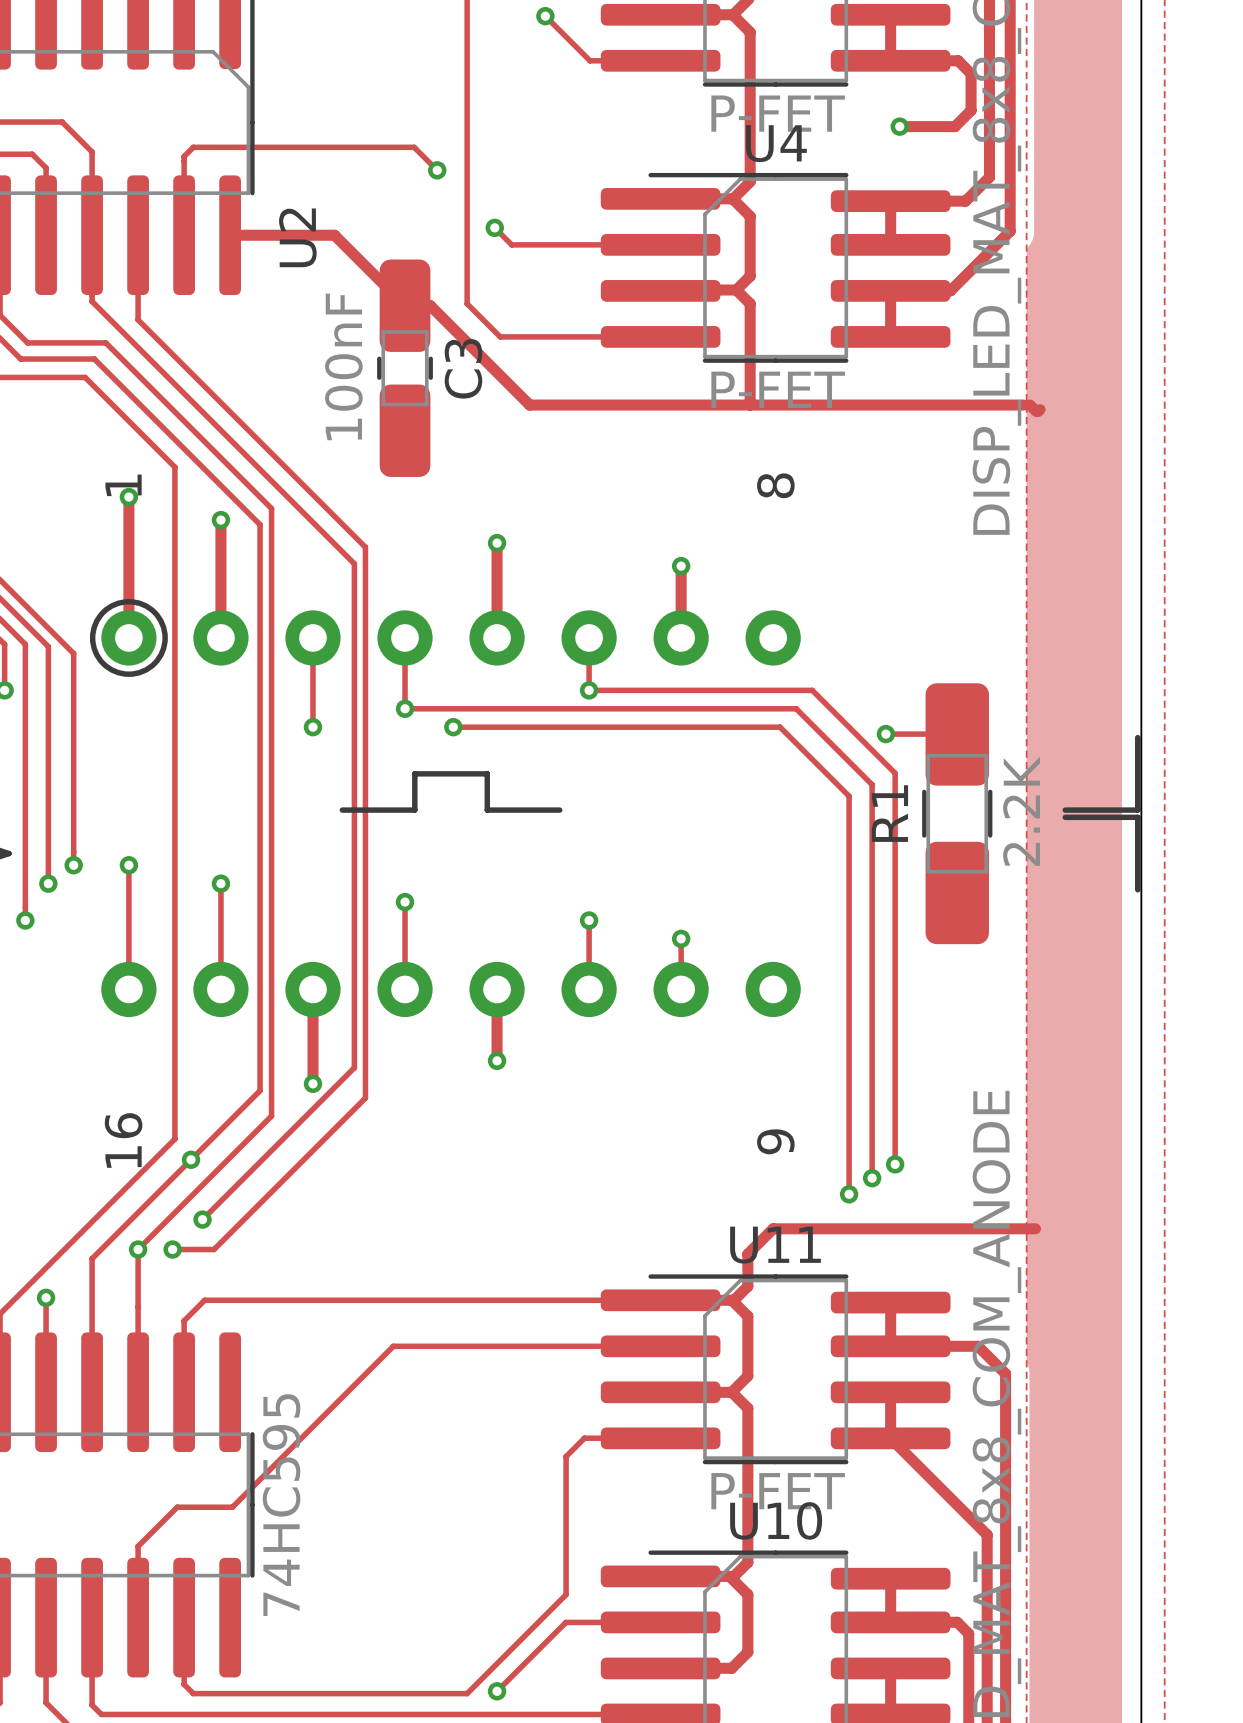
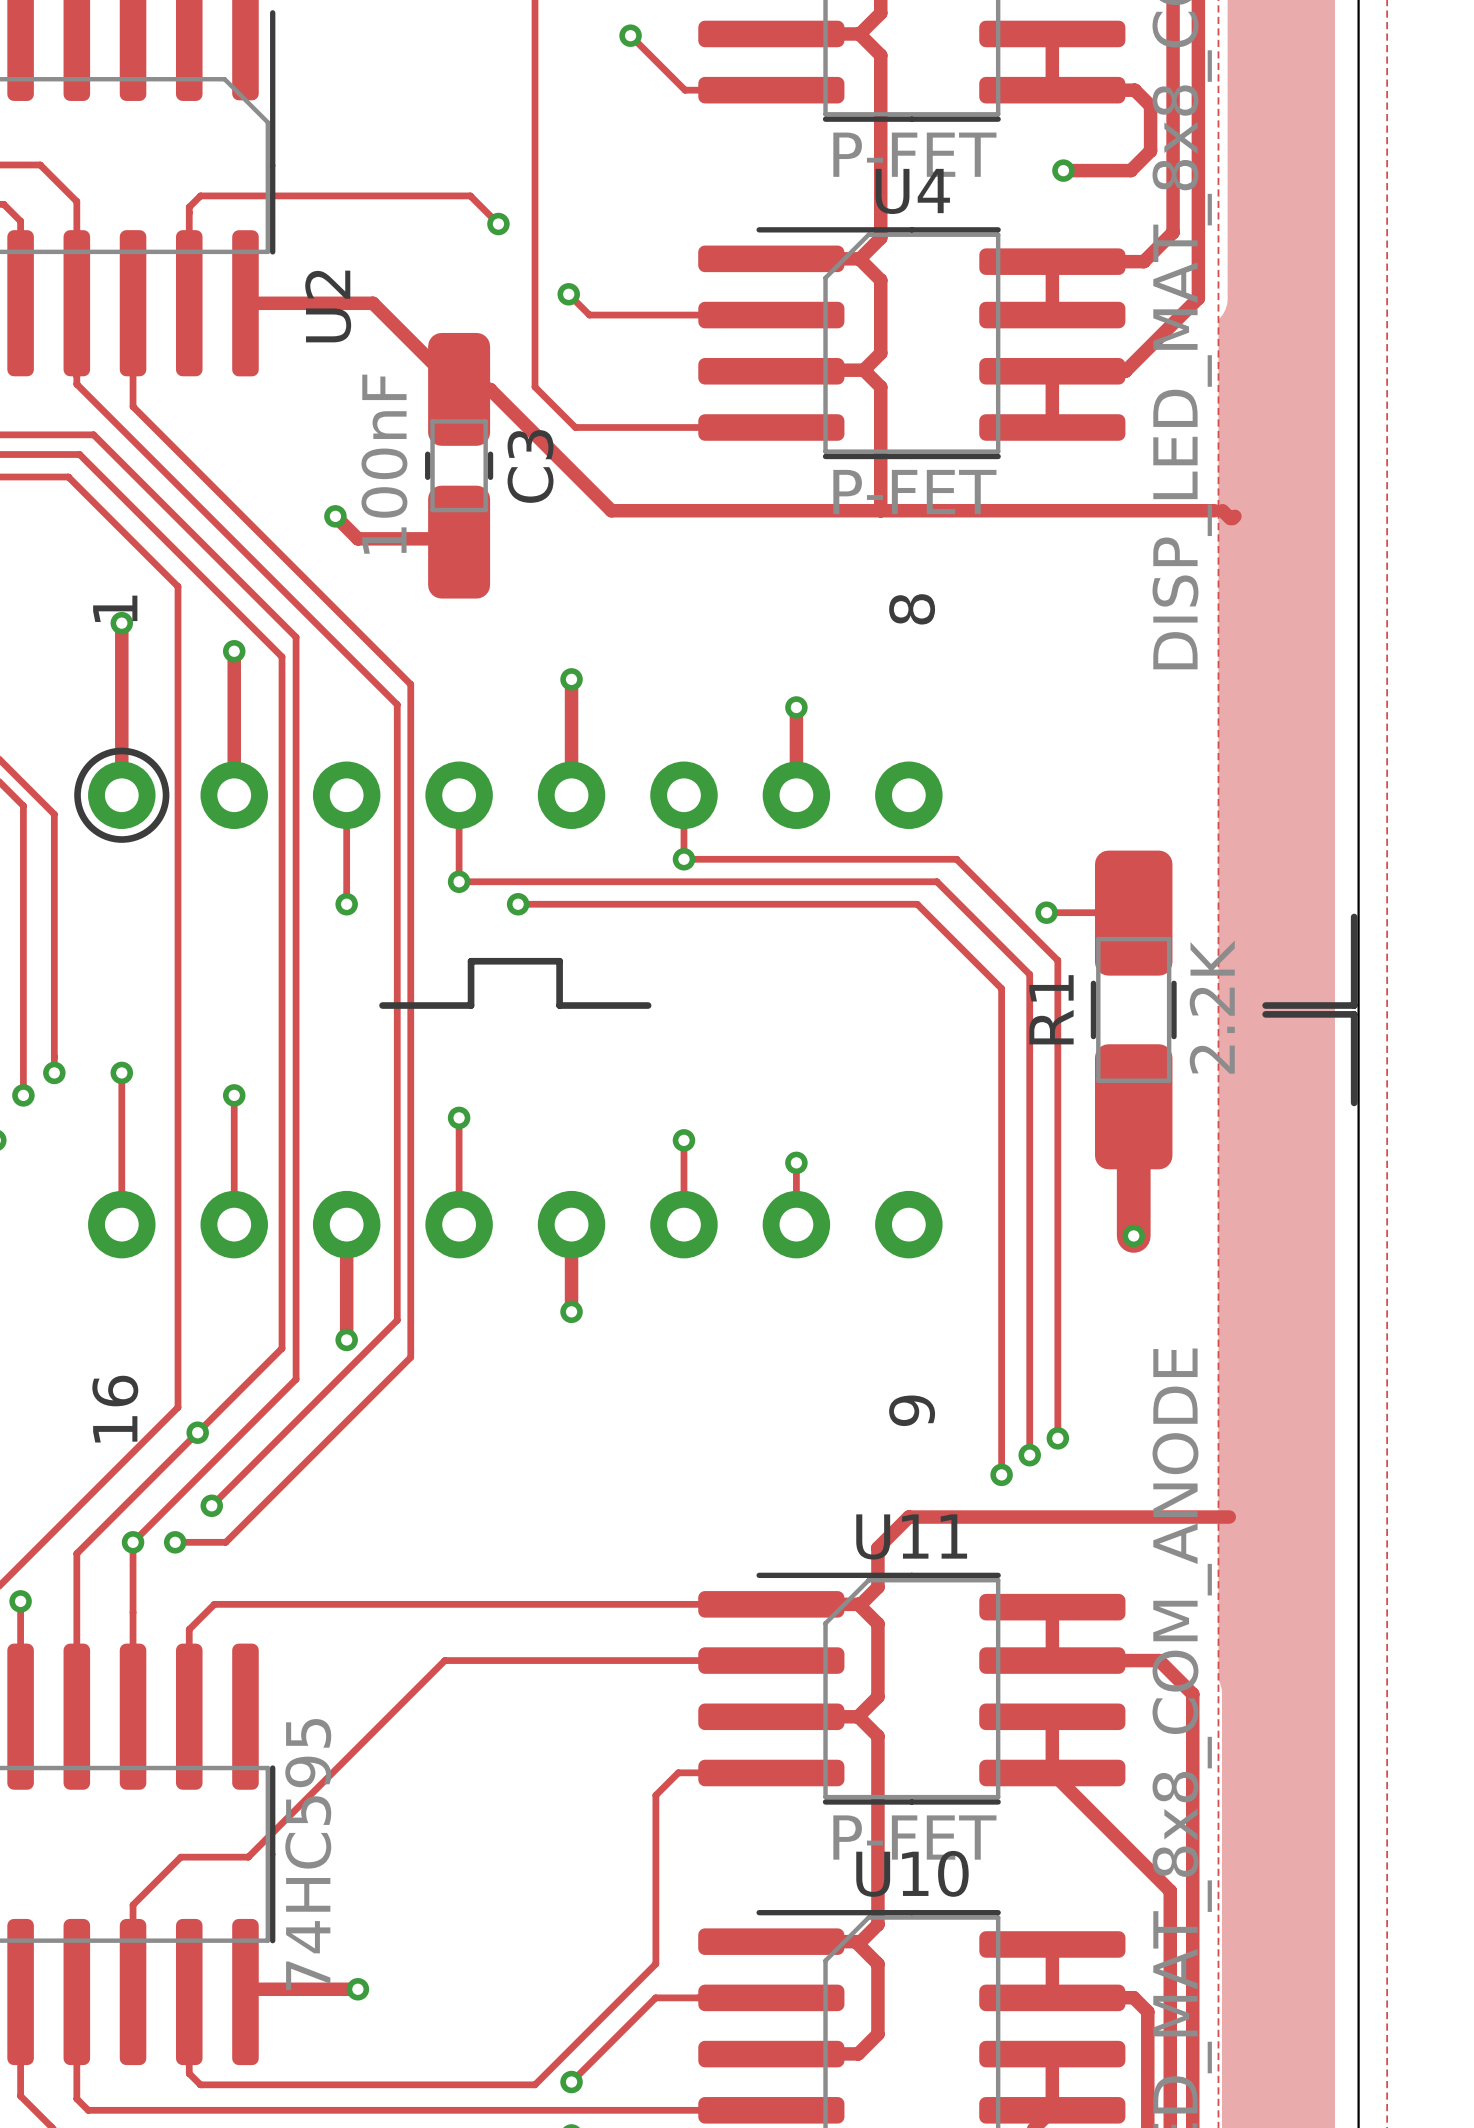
track: none -> (335, 516) (357, 538) (455, 538) (459, 542)
via: none -> (335, 516)
track: none -> (1133, 1106) (1133, 1235)
via: none -> (1133, 1235)
track: none -> (357, 1989) (248, 1989) (245, 1992)
via: none -> (357, 1989)

